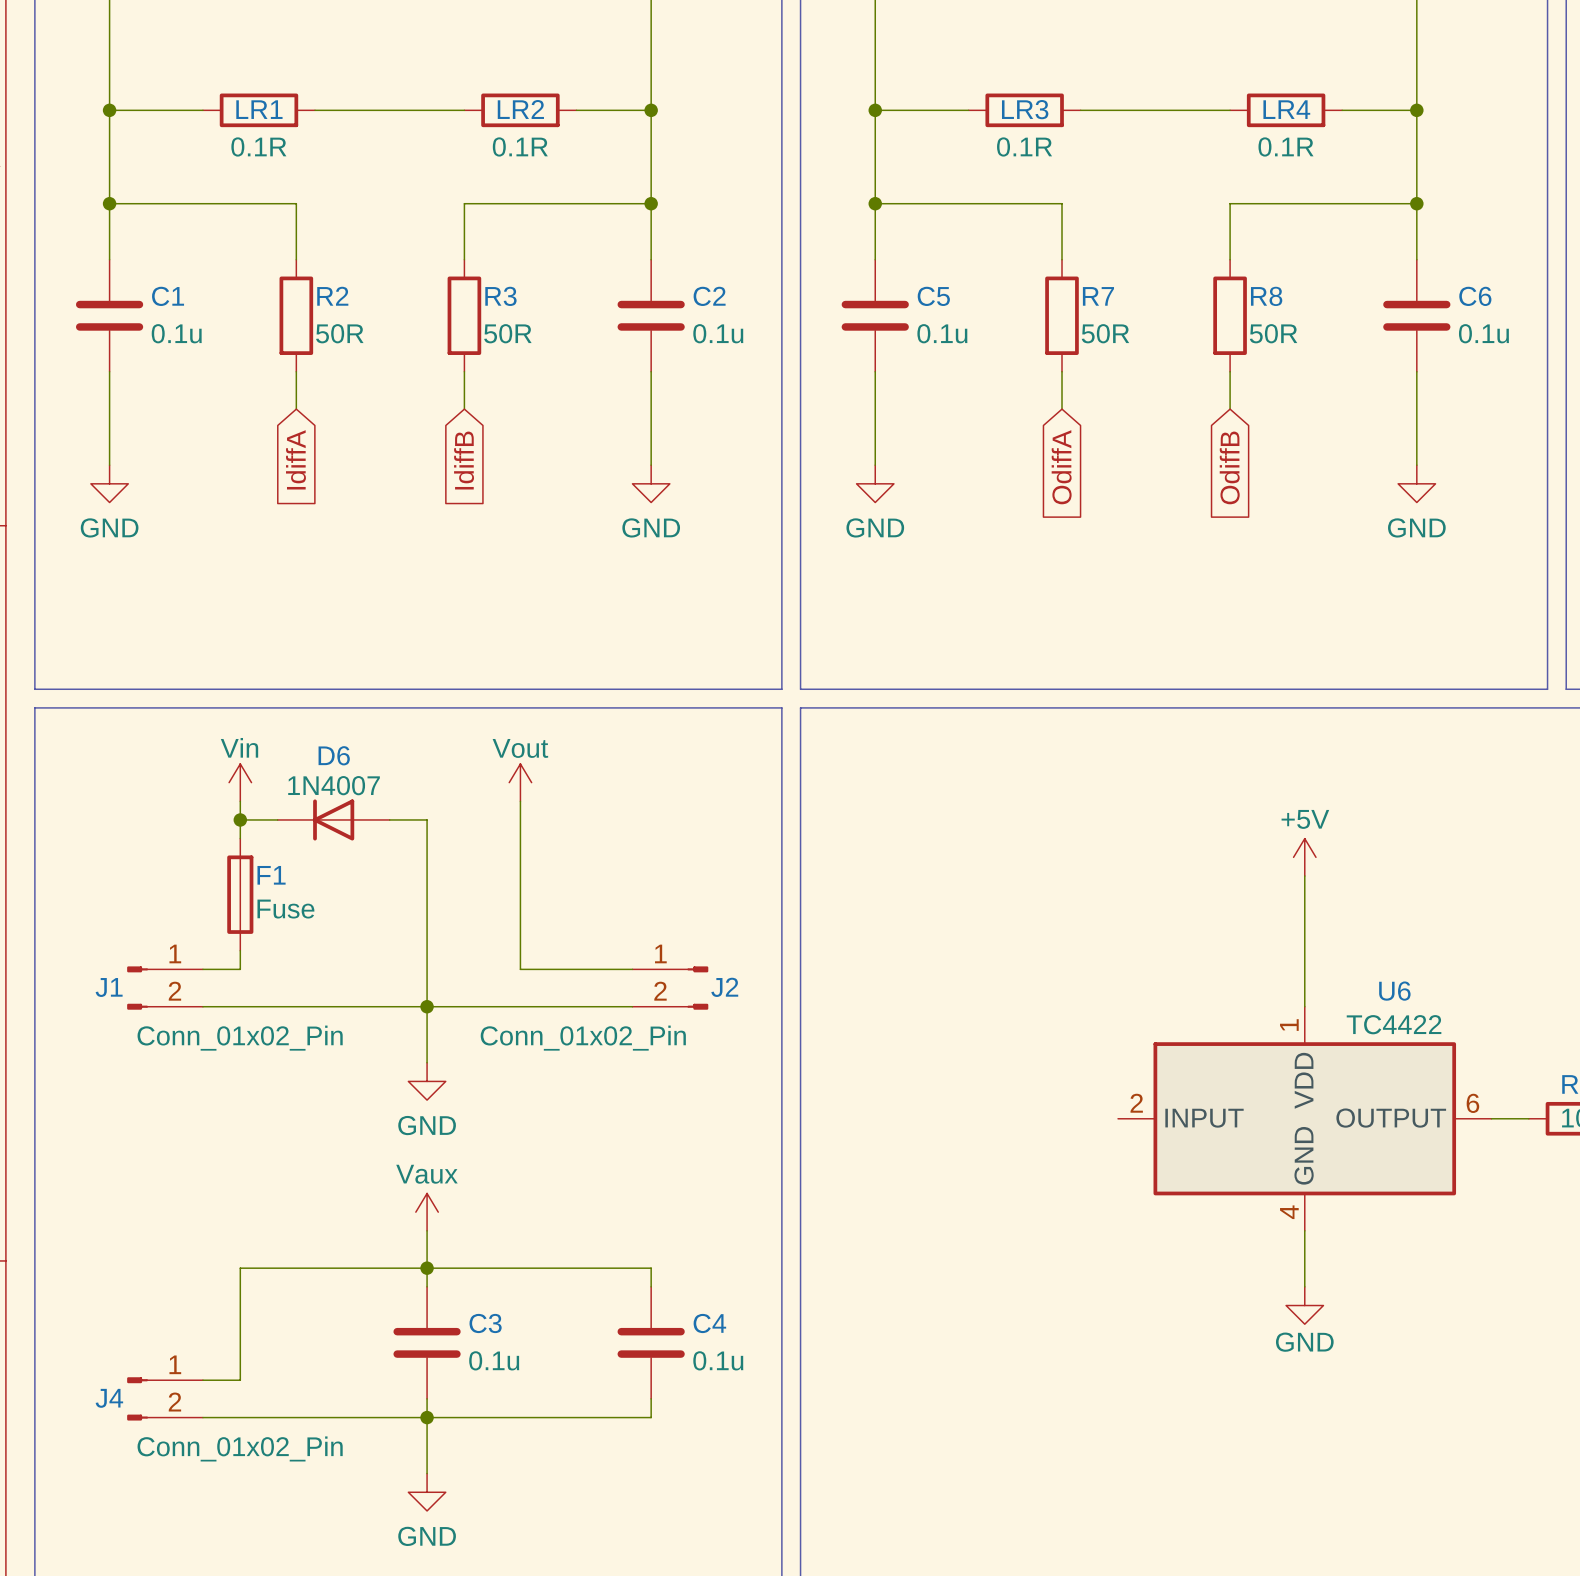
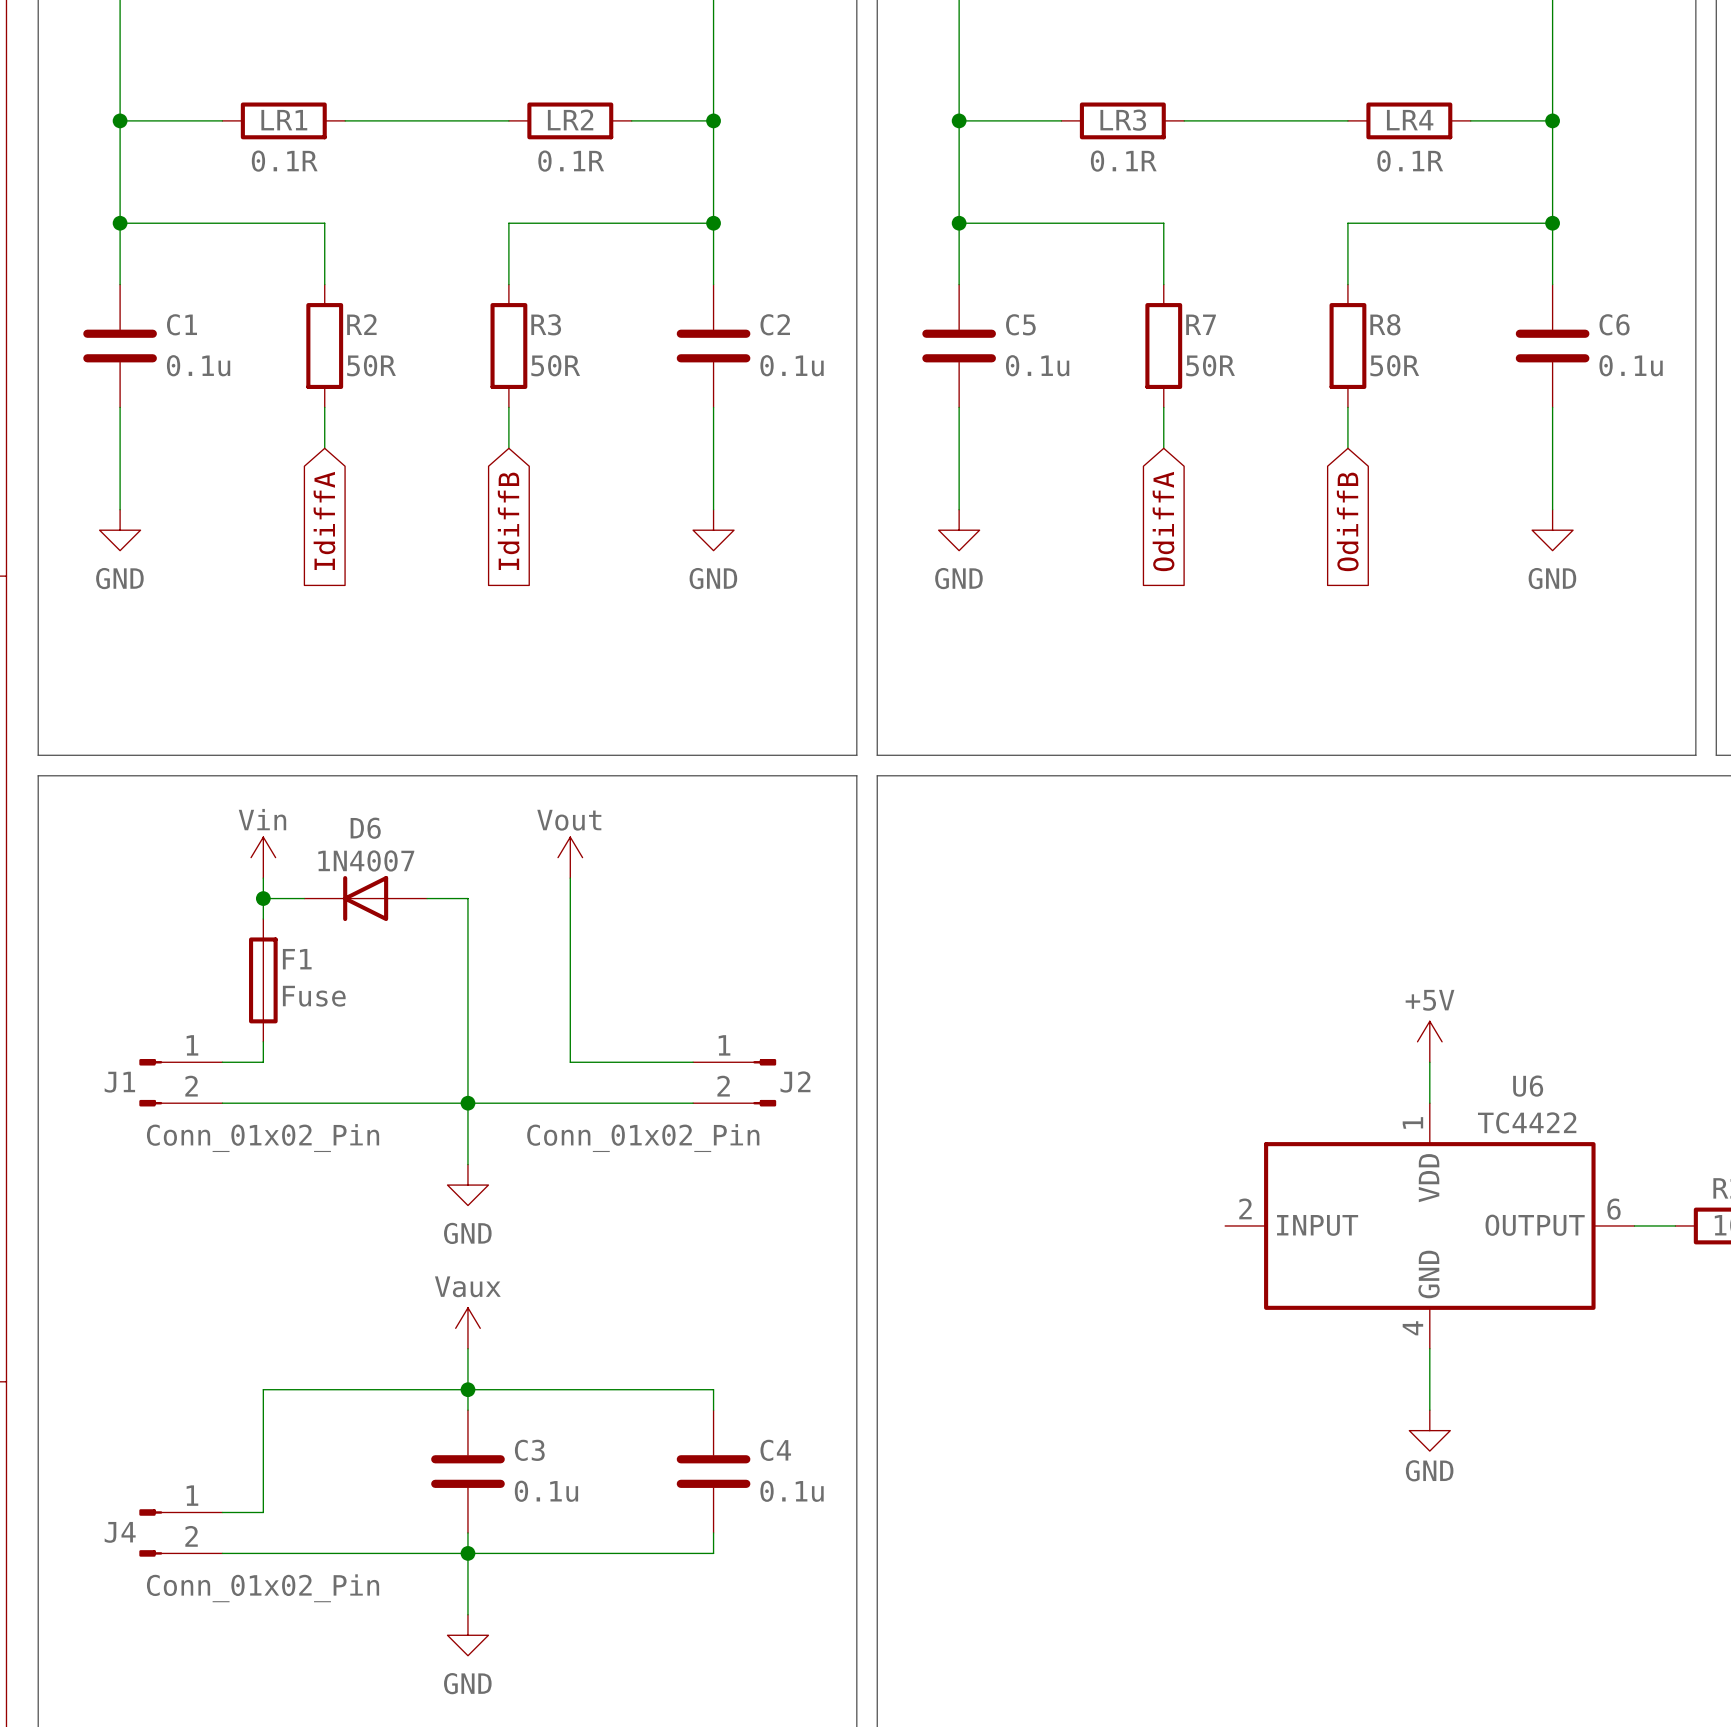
power symbol position: +5V (1304, 857) -> +5V (1429, 1041)
wire: (1304, 876) (1304, 969) -> none

